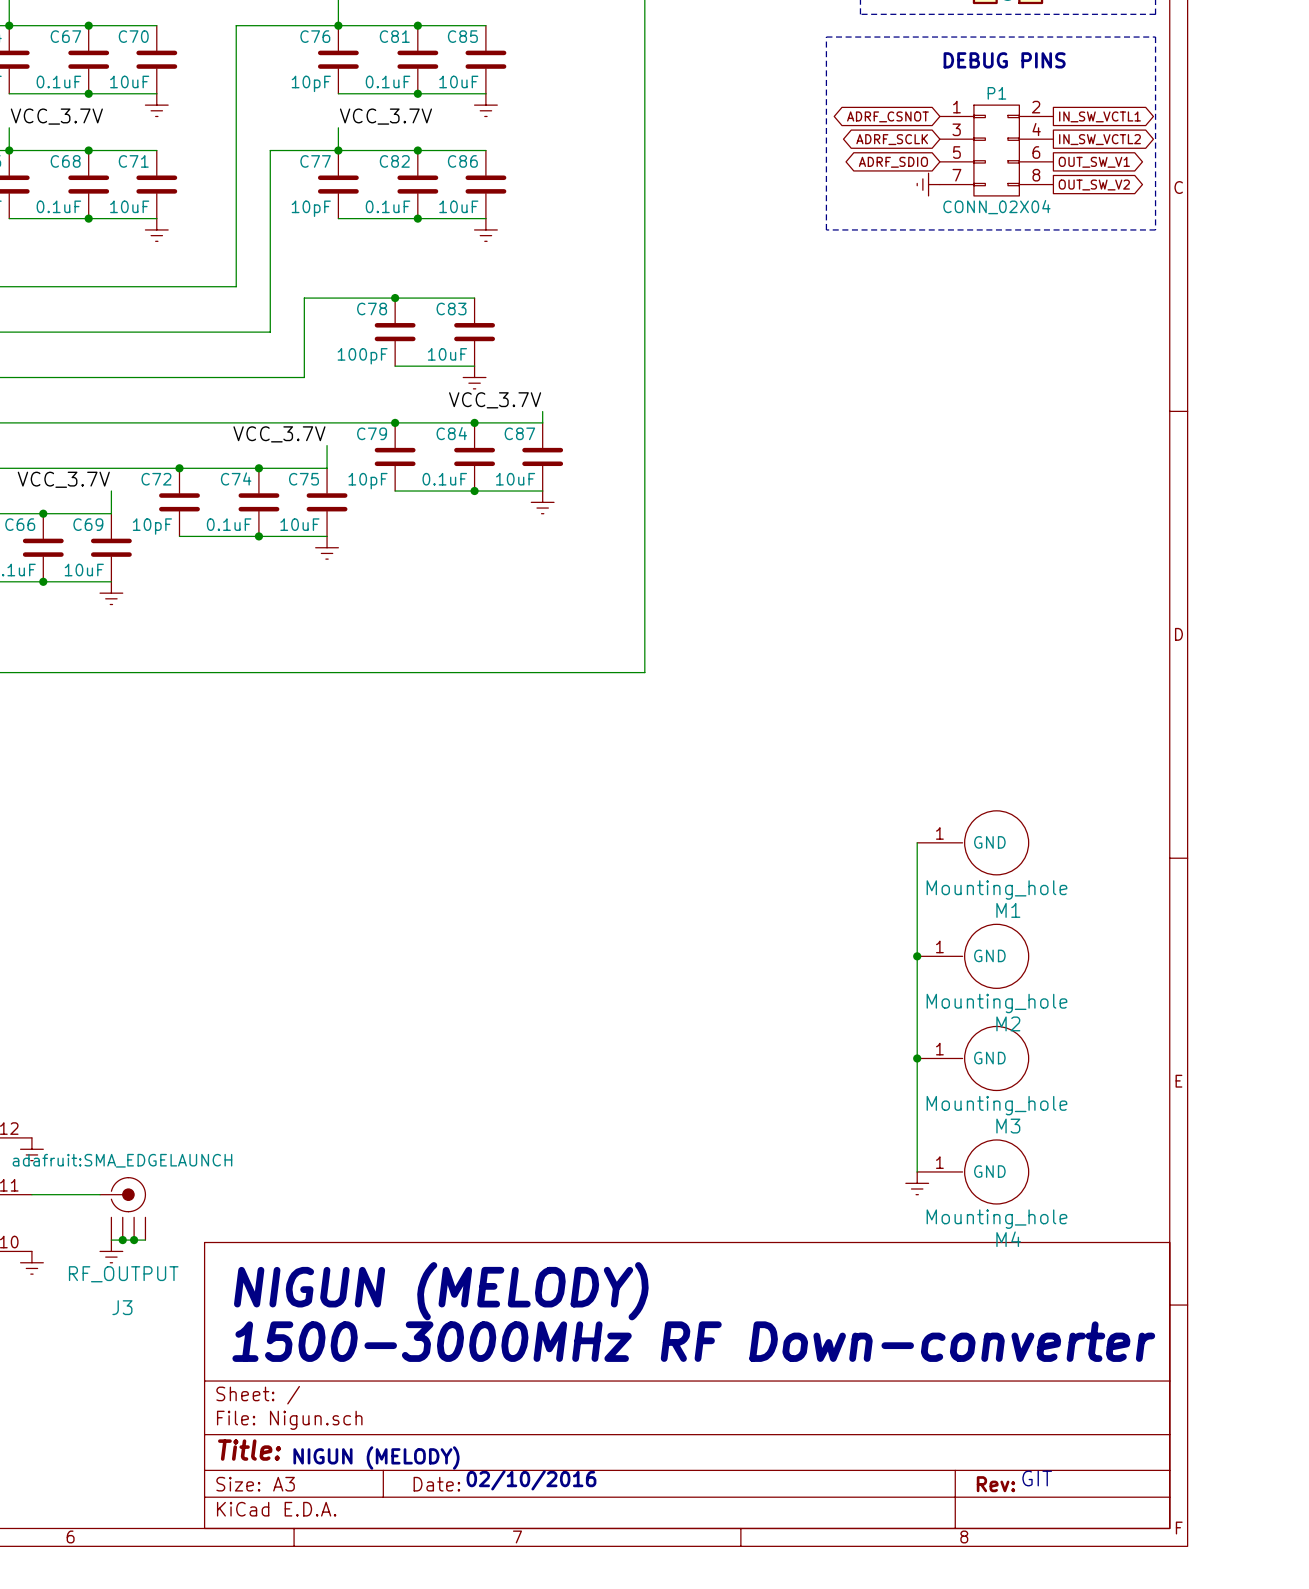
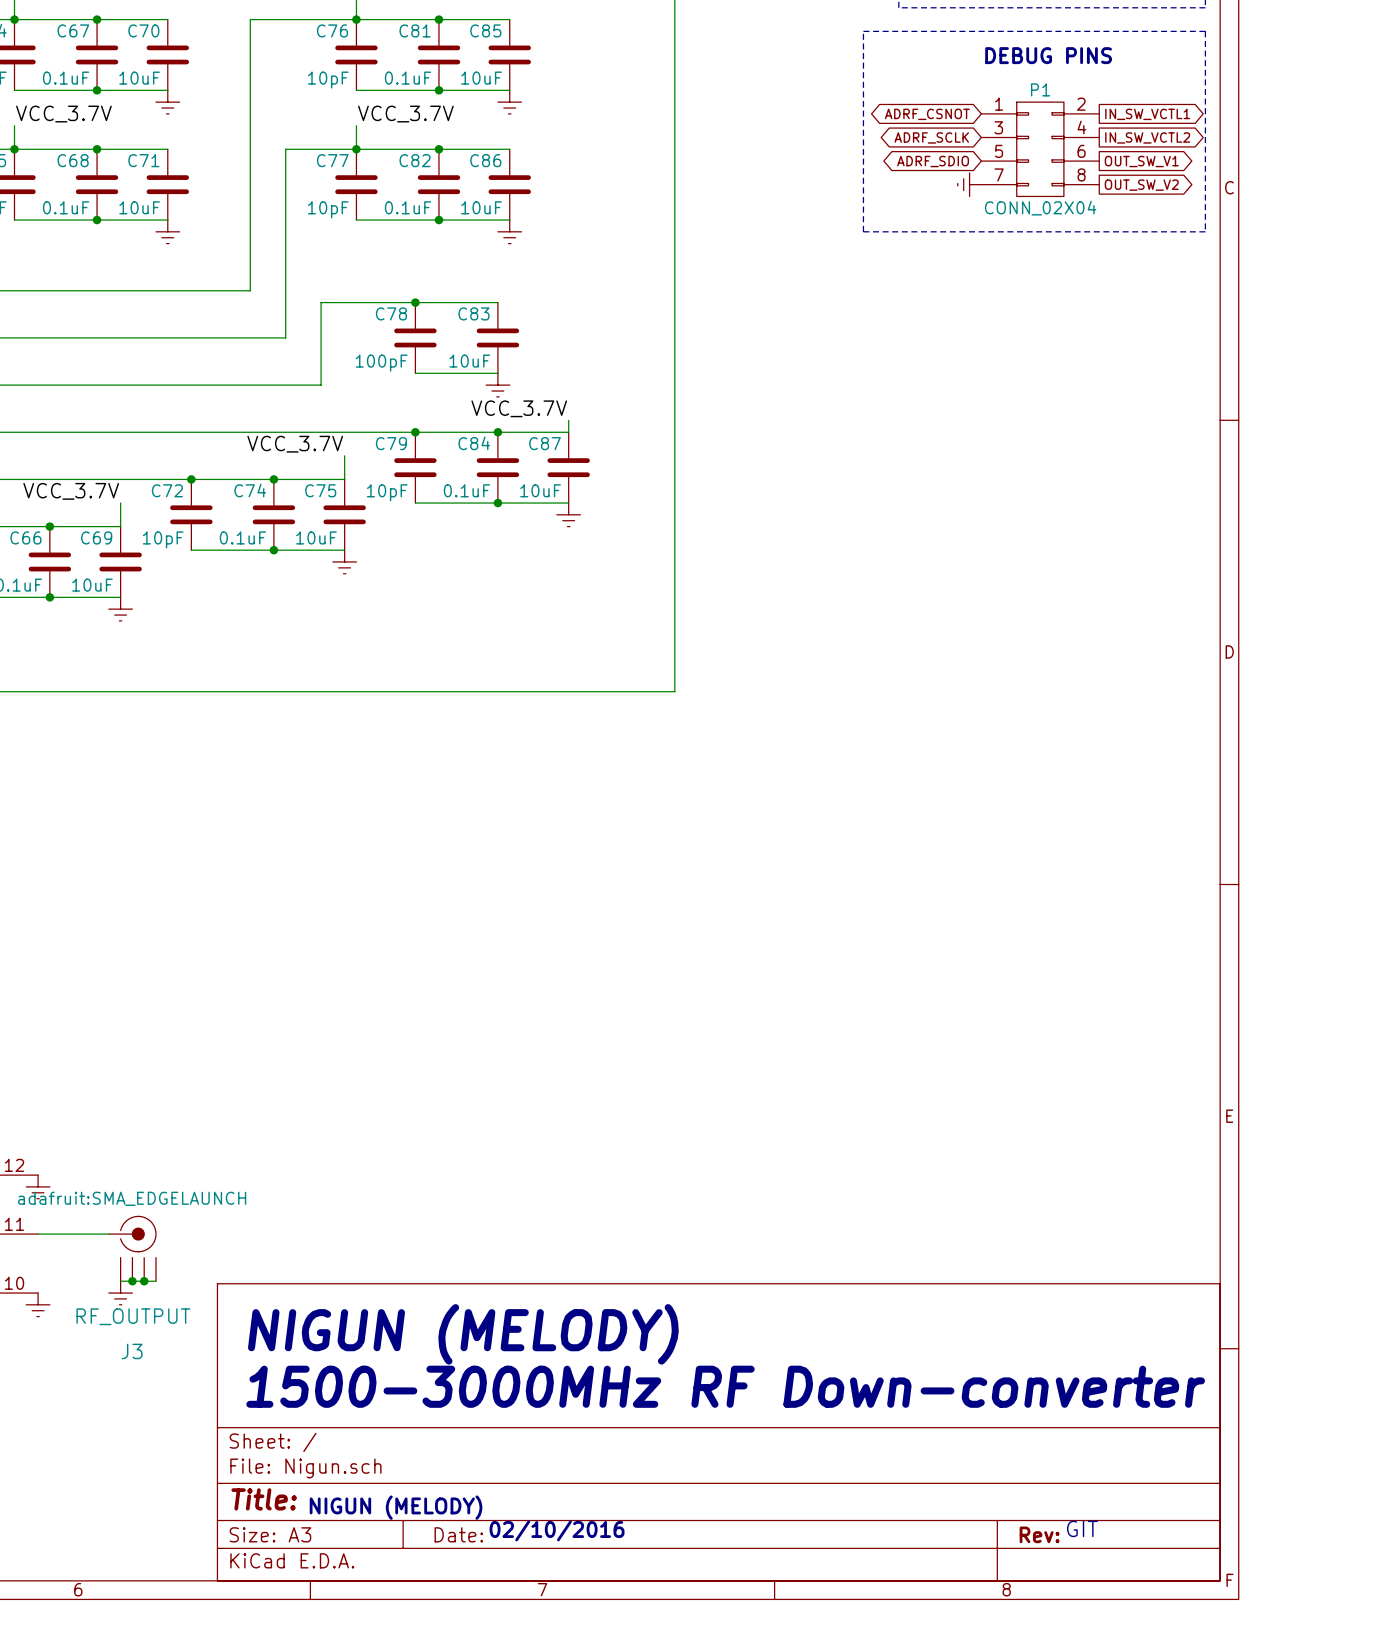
wire: (917, 842) (917, 1171) -> none
M1: Mounting_hole (972, 842) -> none
junction: (917, 956) -> none
M2: Mounting_hole (972, 956) -> none
junction: (917, 1058) -> none
M3: Mounting_hole (972, 1058) -> none
M4: Mounting_hole (972, 1171) -> none
power symbol: (917, 1183) -> none

